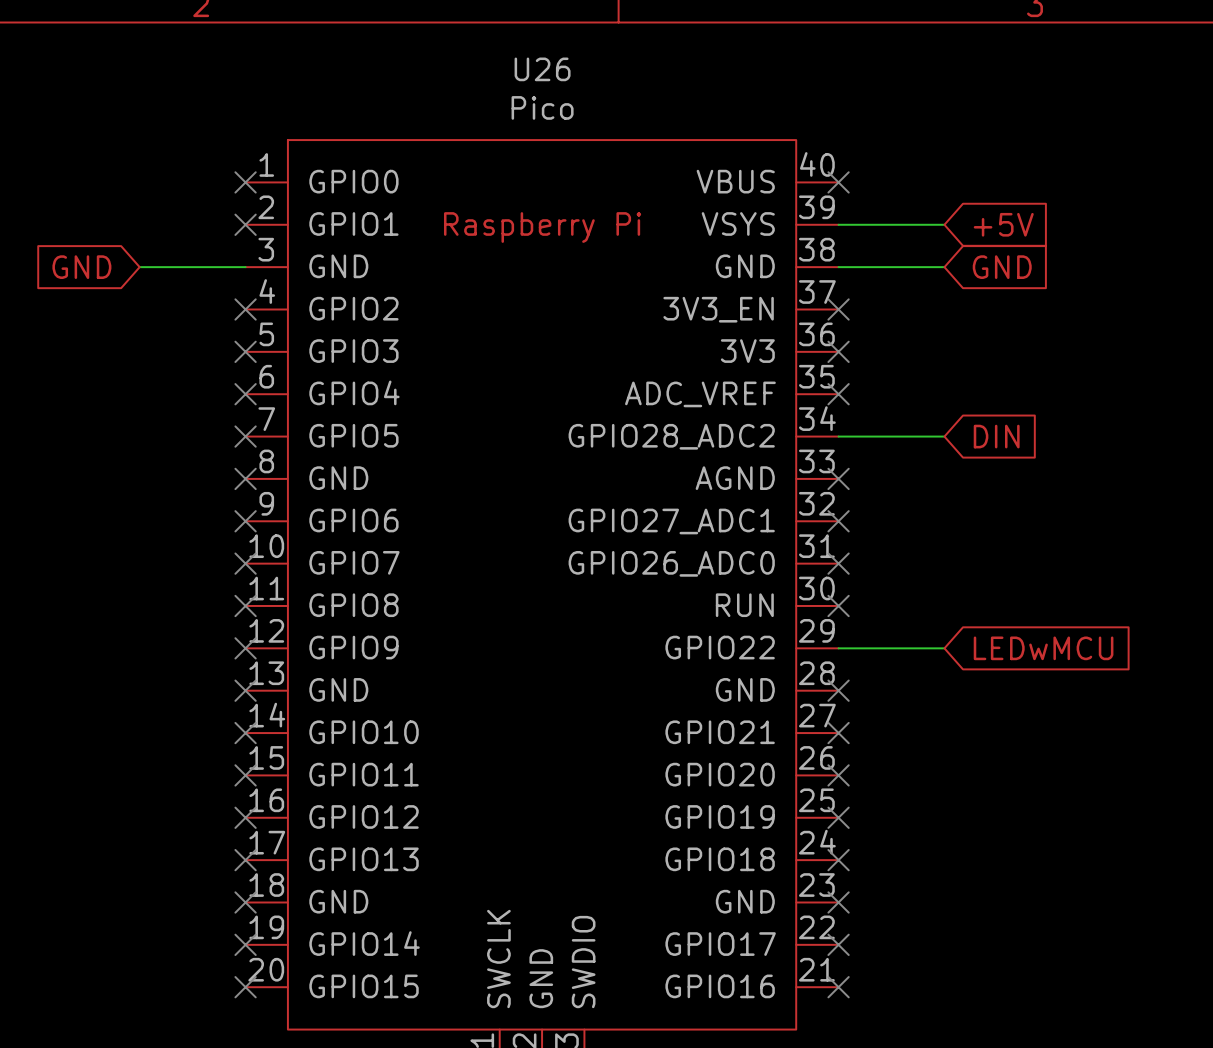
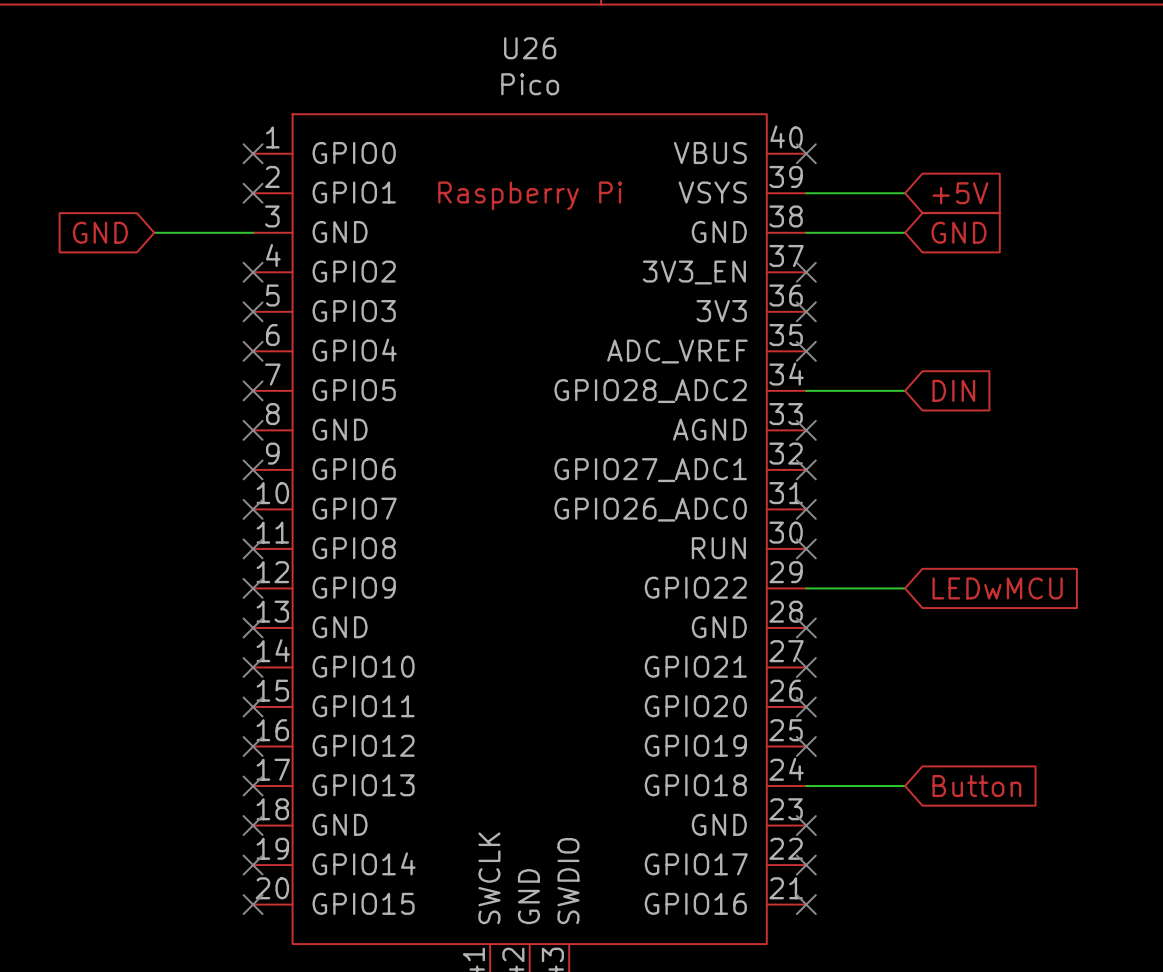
wire: none -> (806, 786) (905, 786)
no-connect mark: (838, 860) -> none
global label: none -> Button (976, 786)

